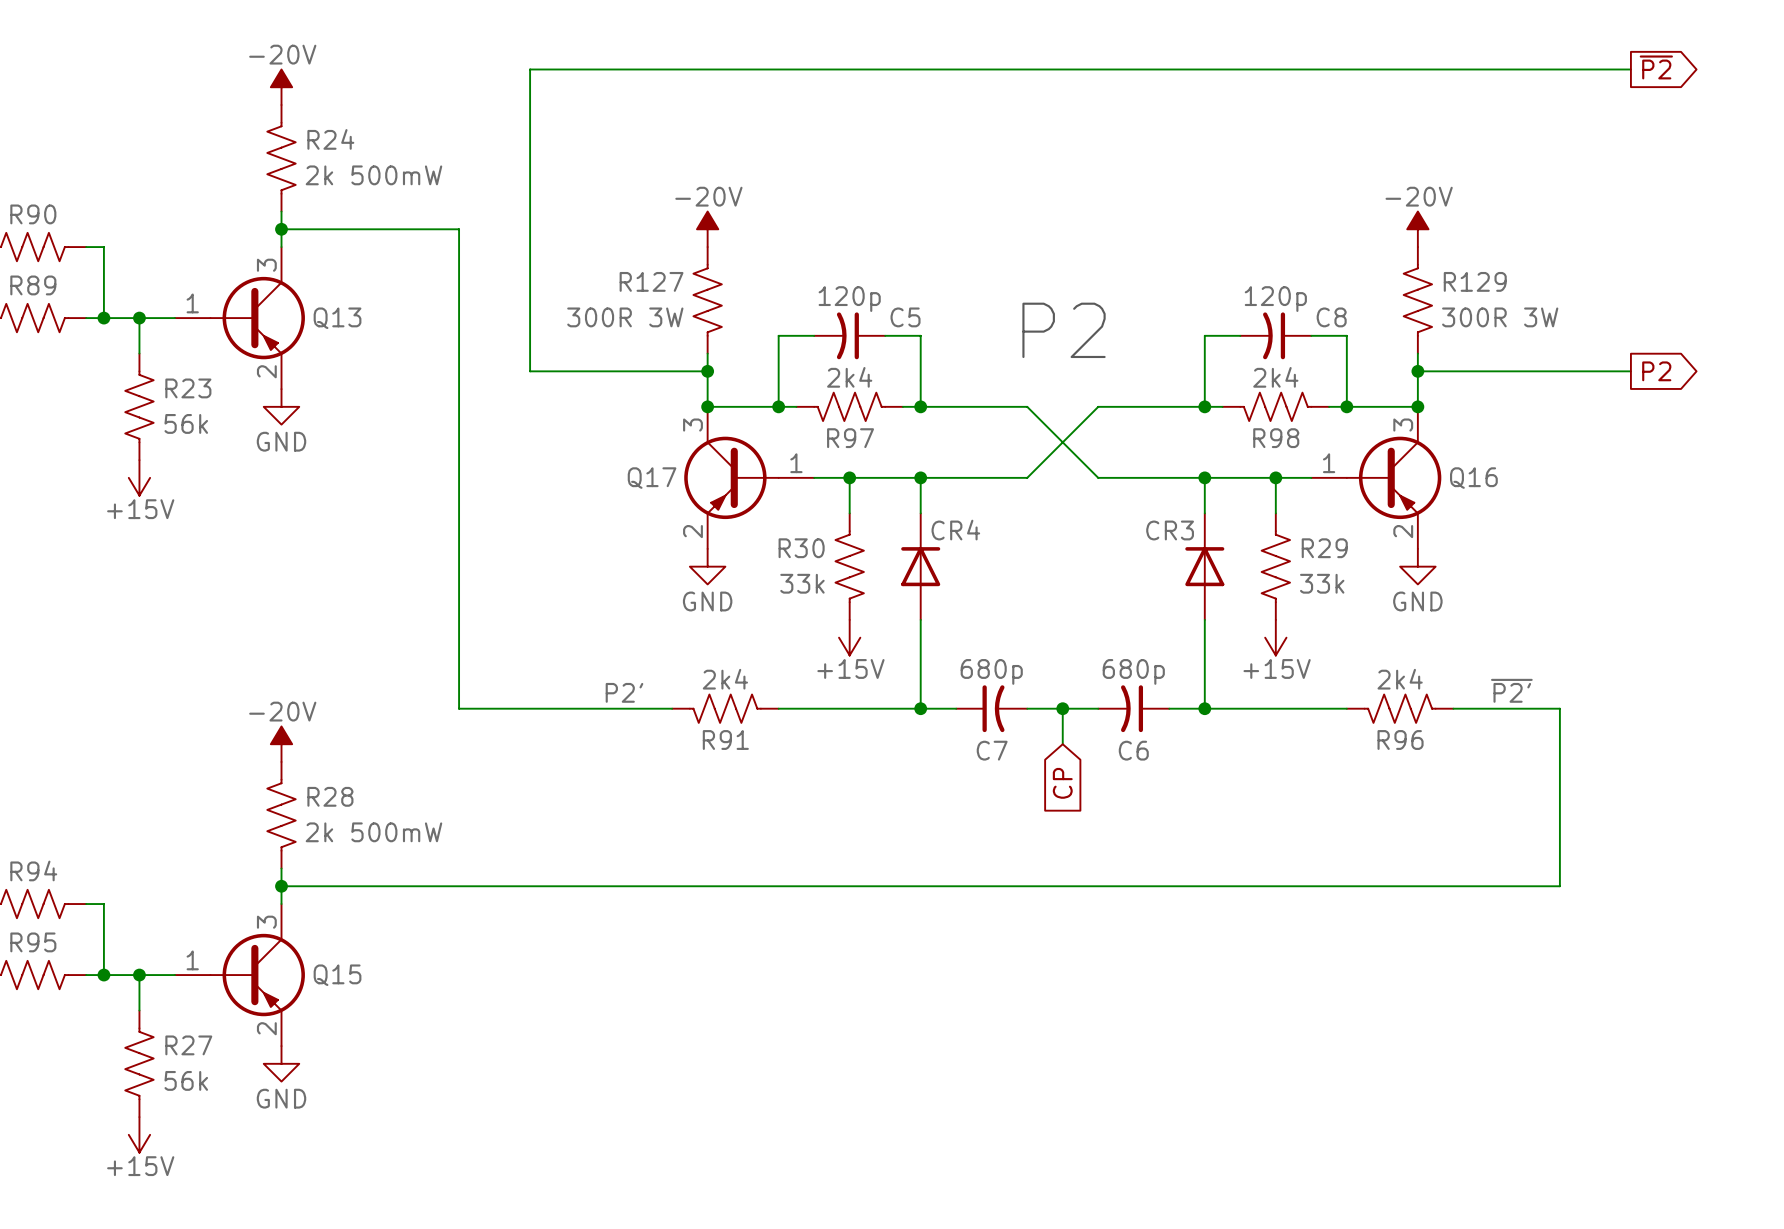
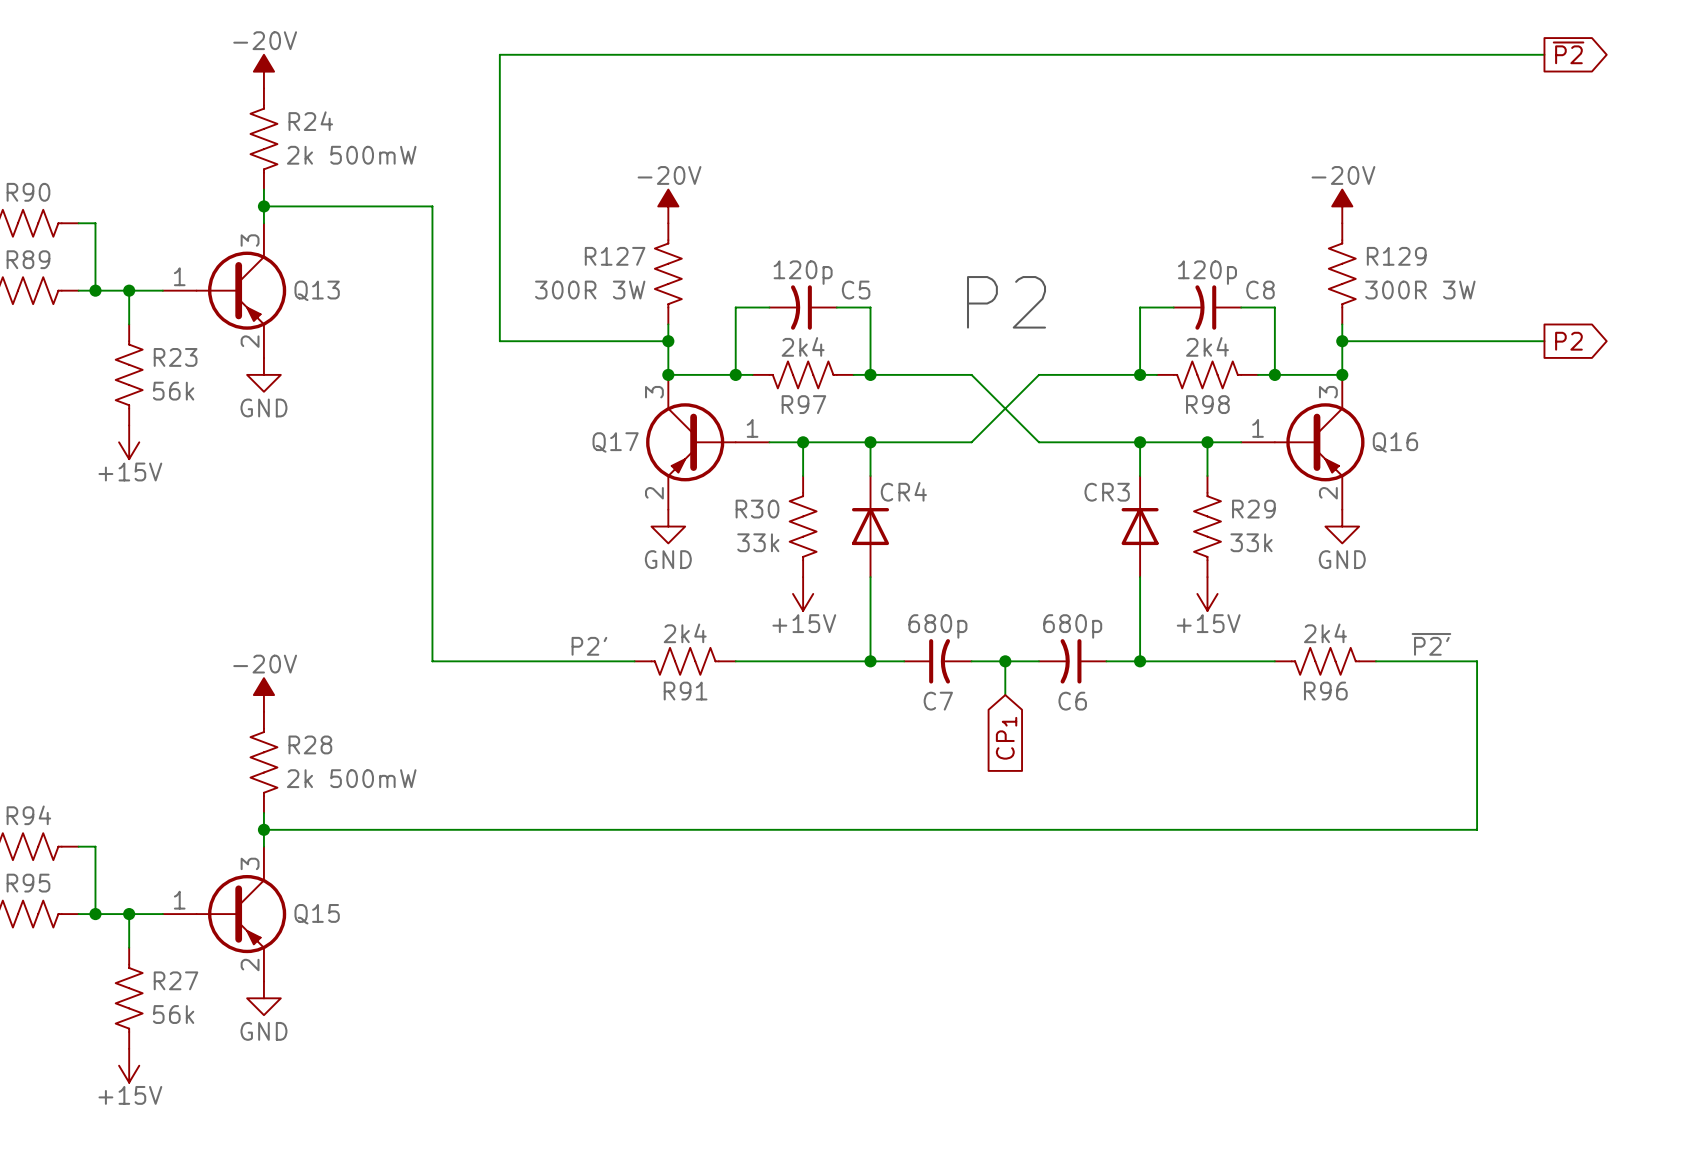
global label: CP (1062, 783) -> CP1 (1006, 738)

